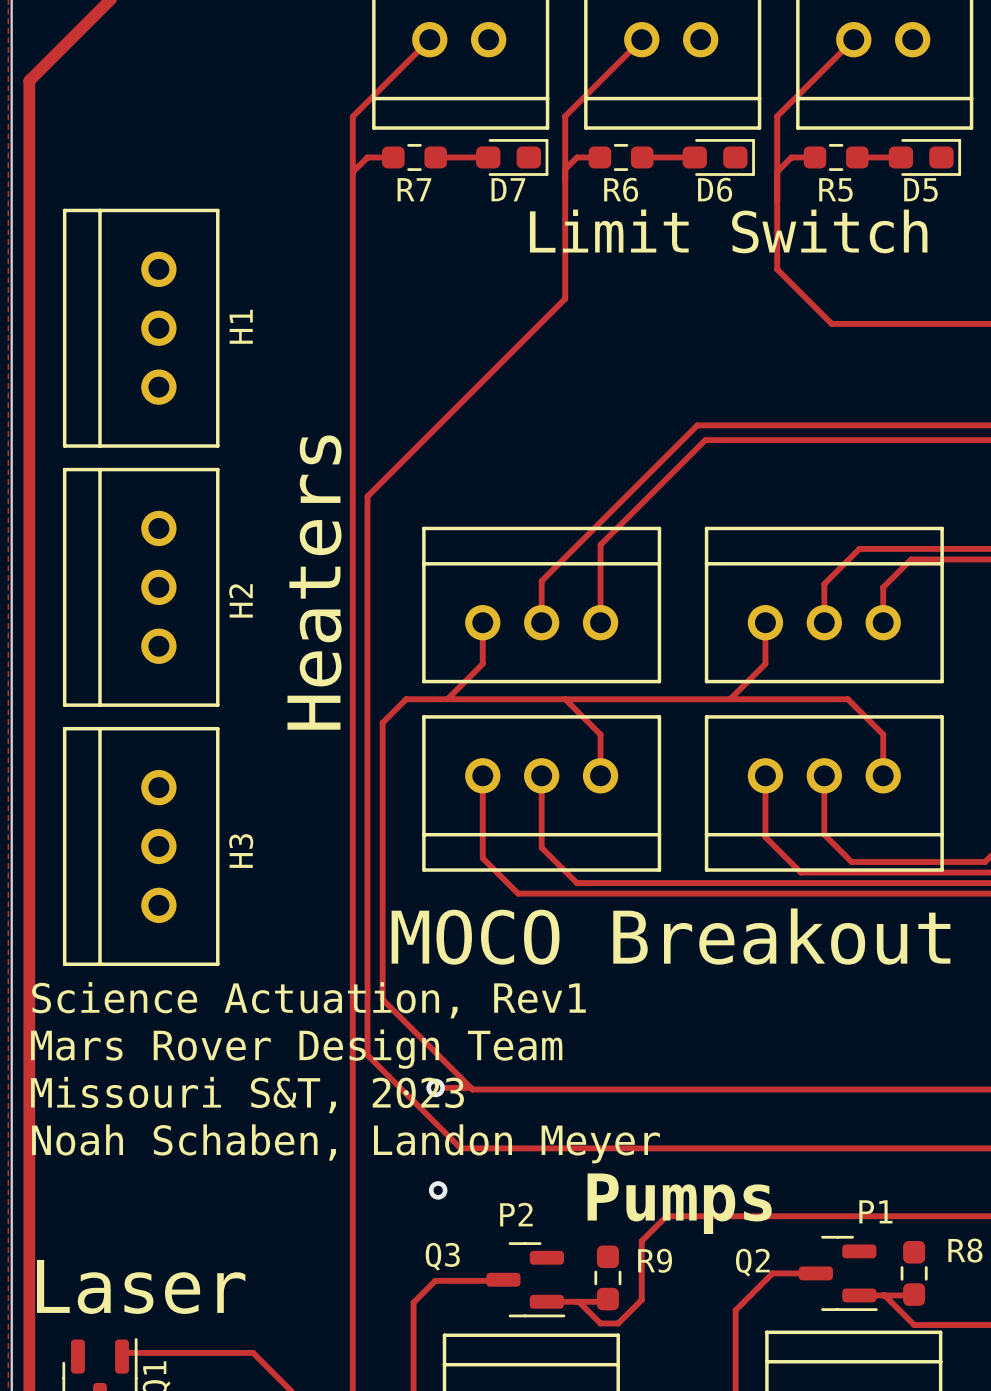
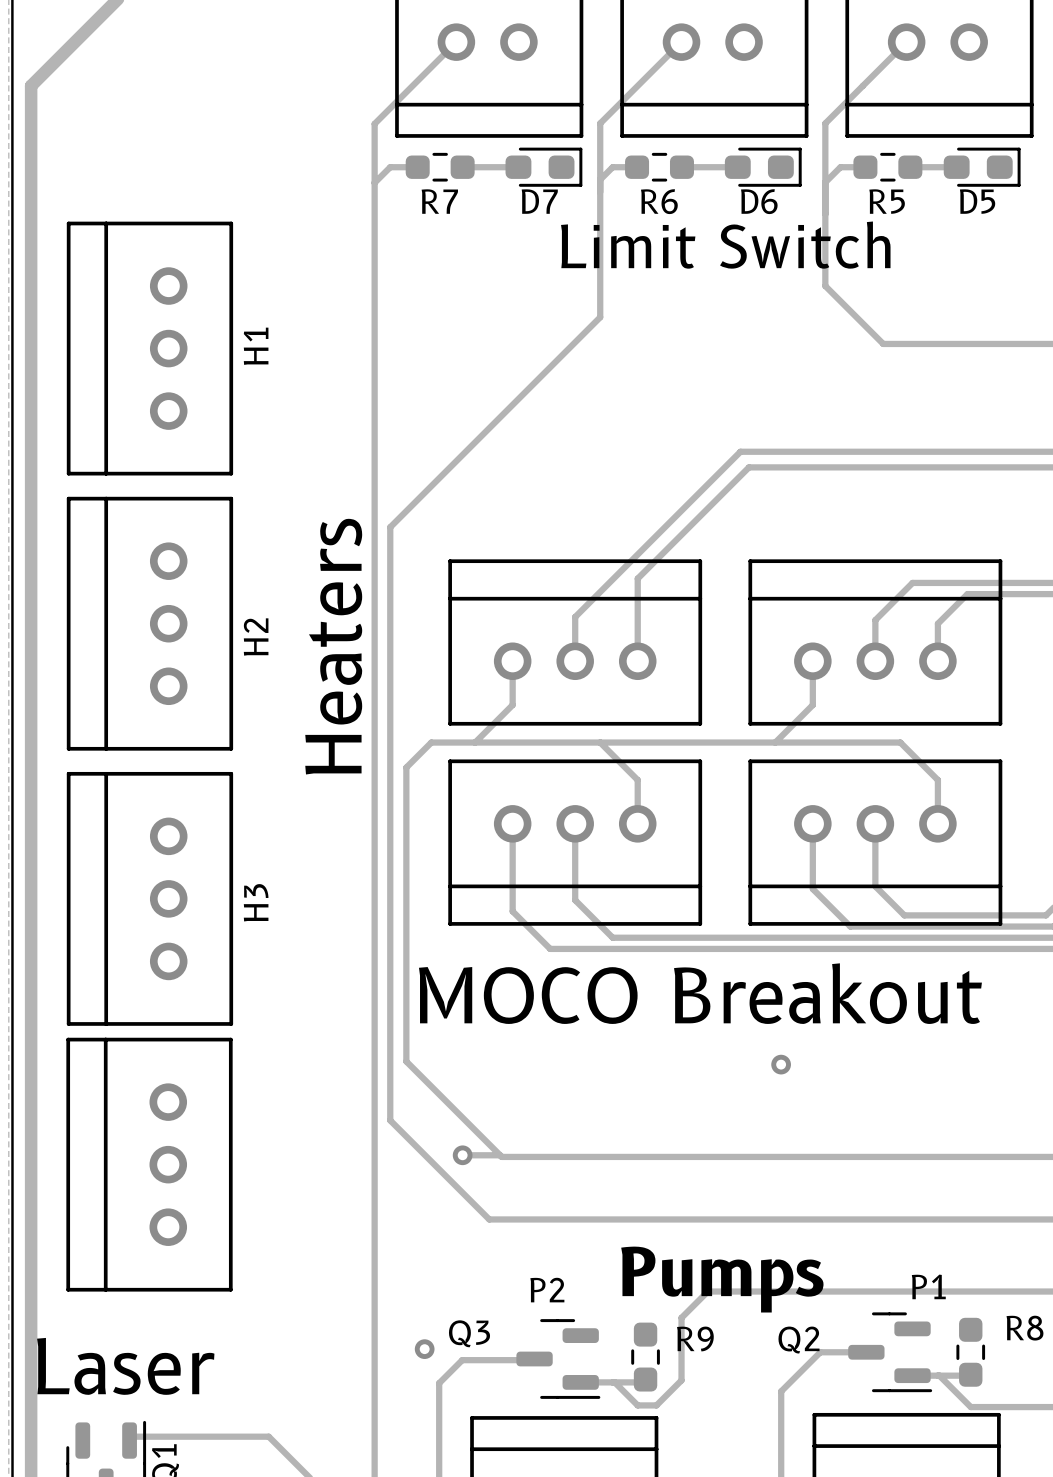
text: Science Actuation, Rev1 (308, 1000) -> none
via: none -> (781, 1064)
text: Mars Rover Design Team (296, 1049) -> none
text: Missouri S&T, 2023 (247, 1095) -> none
part: none -> (149, 1164)
text: Noah Schaben, Landon Meyer (346, 1143) -> none
via position: (438, 1190) -> (424, 1349)

